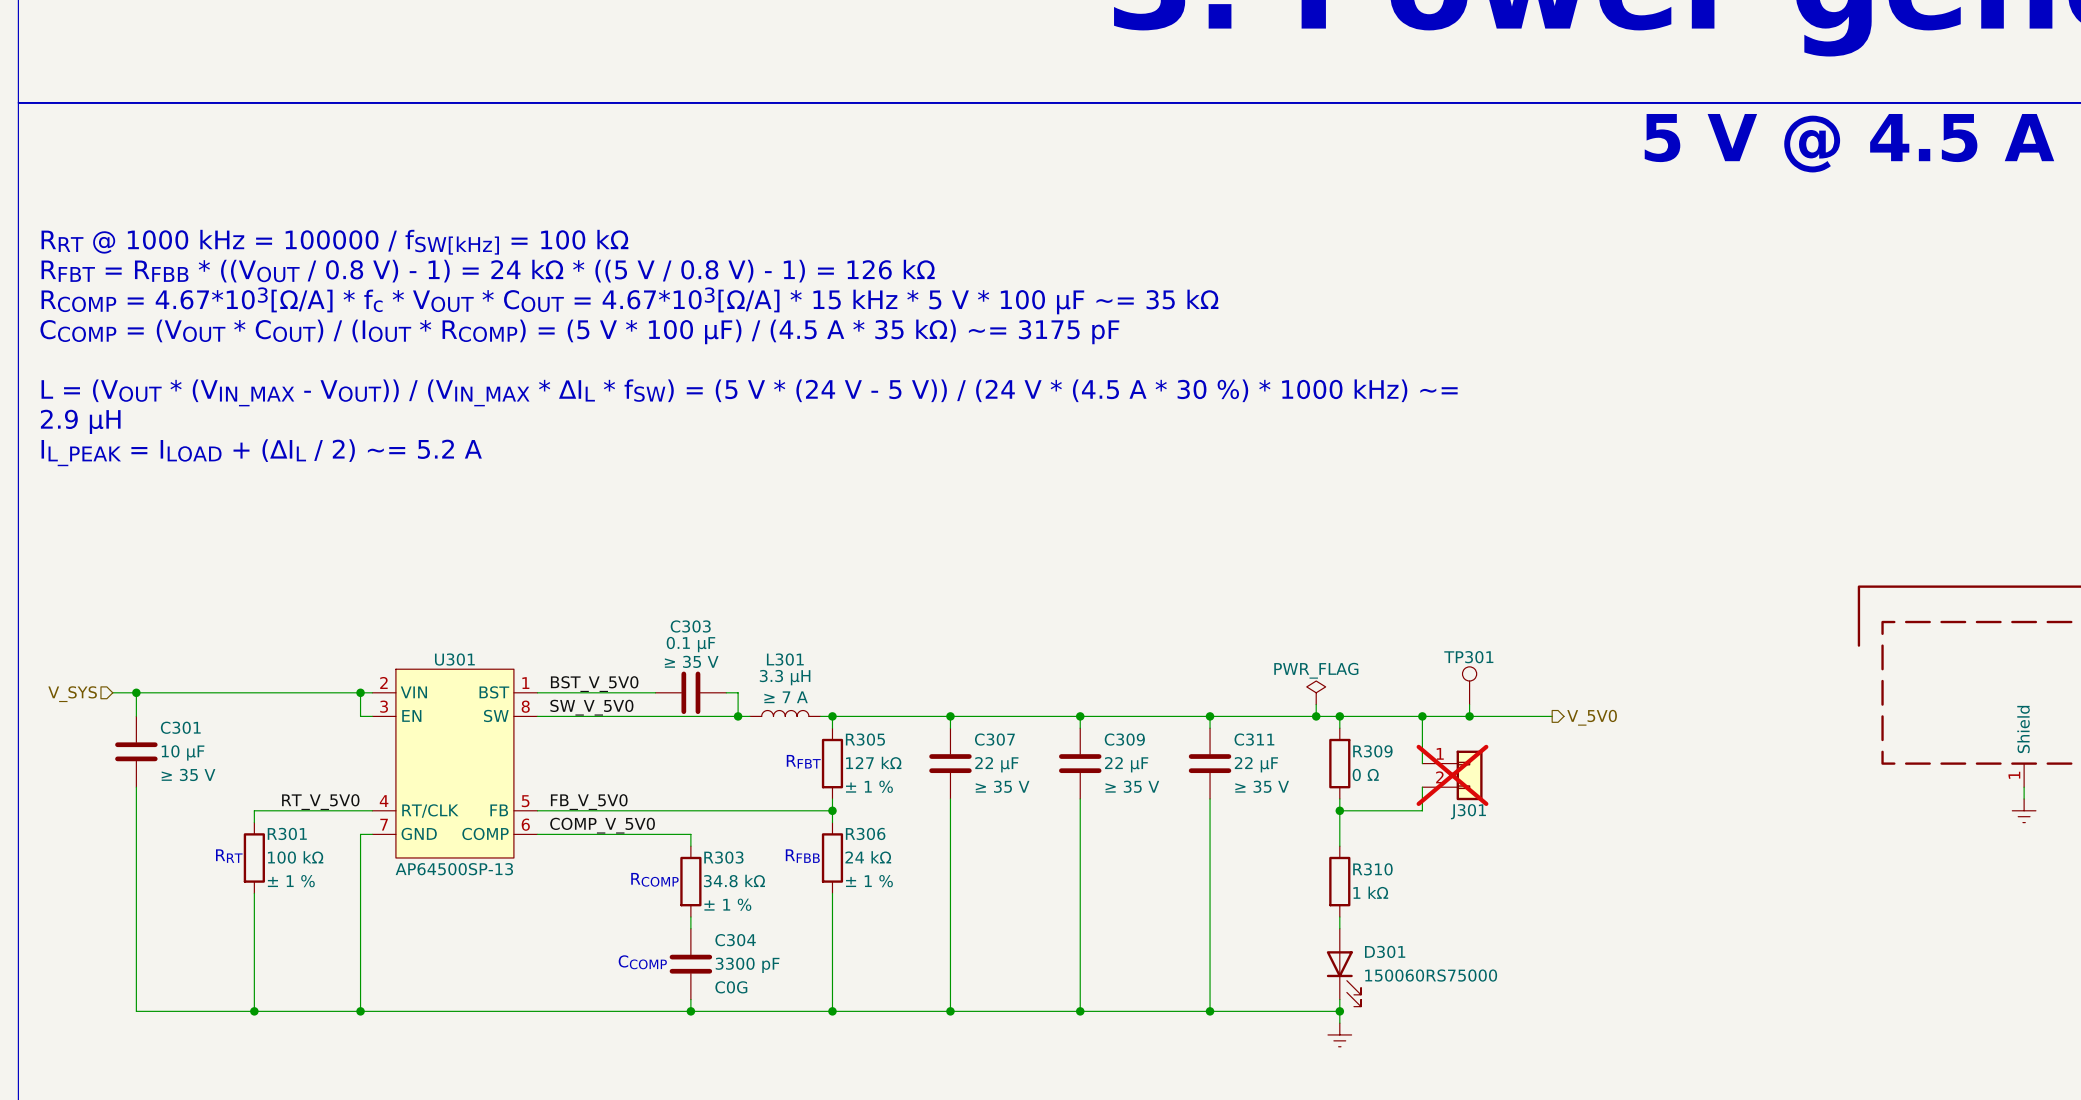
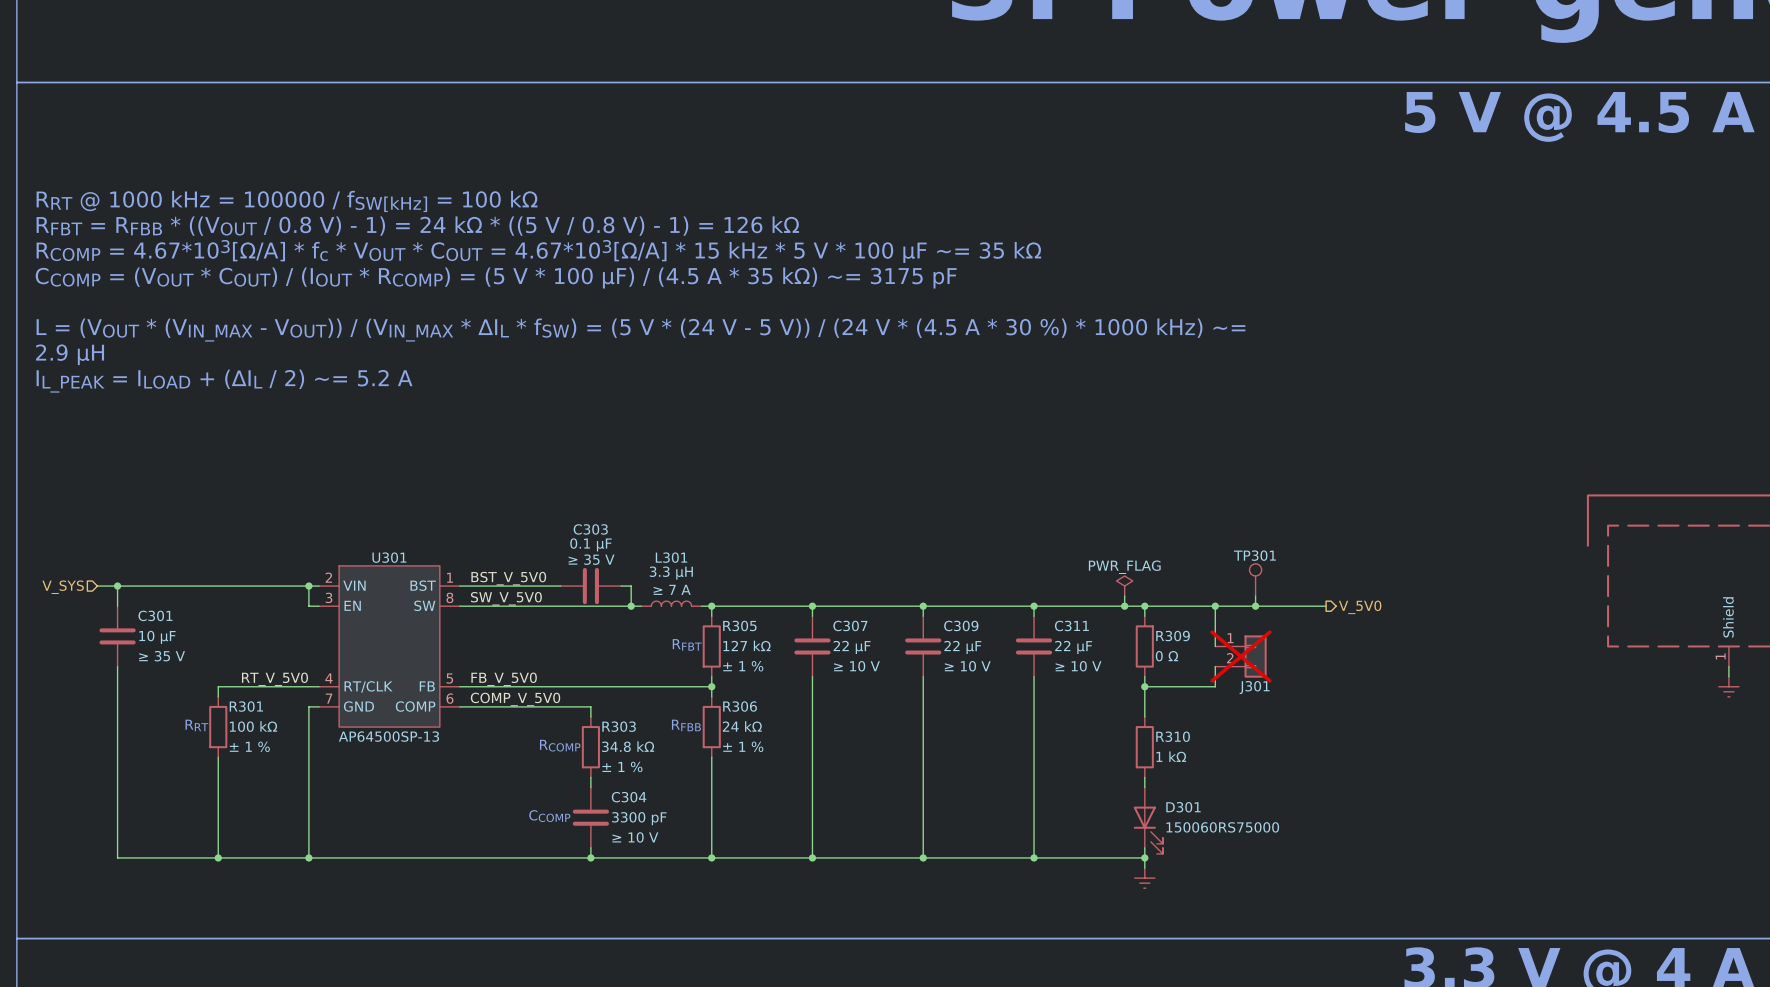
C307 text: ≥ 35 V (1002, 786) -> ≥ 10 V (856, 666)
C309 text: ≥ 35 V (1132, 786) -> ≥ 10 V (967, 666)
C311 text: ≥ 35 V (1262, 786) -> ≥ 10 V (1078, 666)
C304 text: C0G (731, 987) -> none
C304 text: none -> ≥ 10 V (635, 837)

